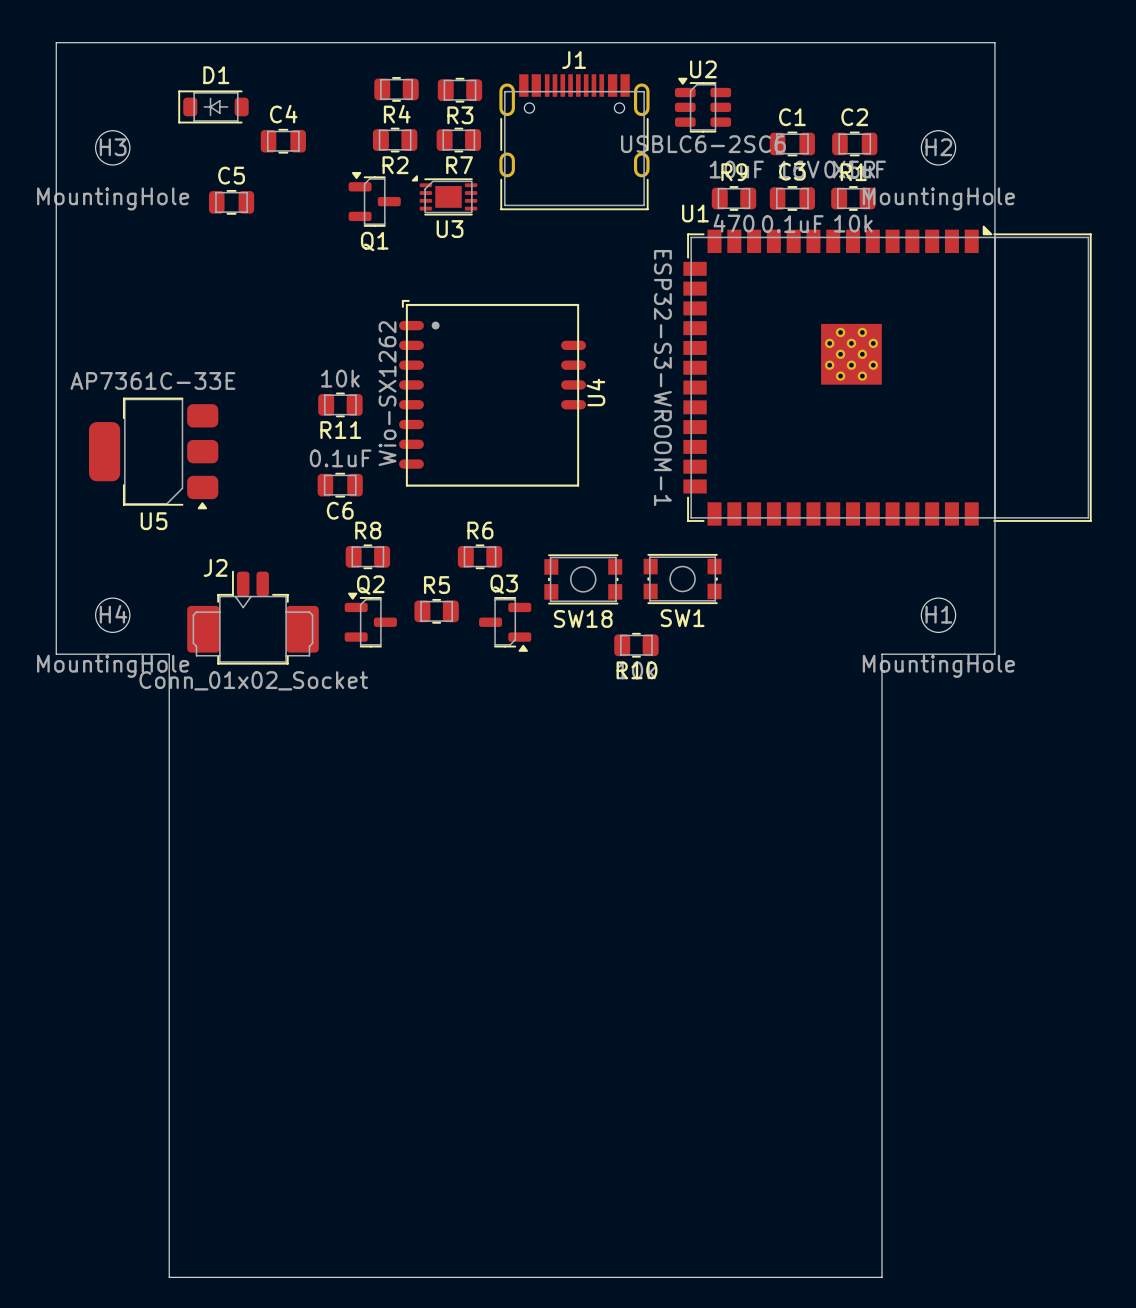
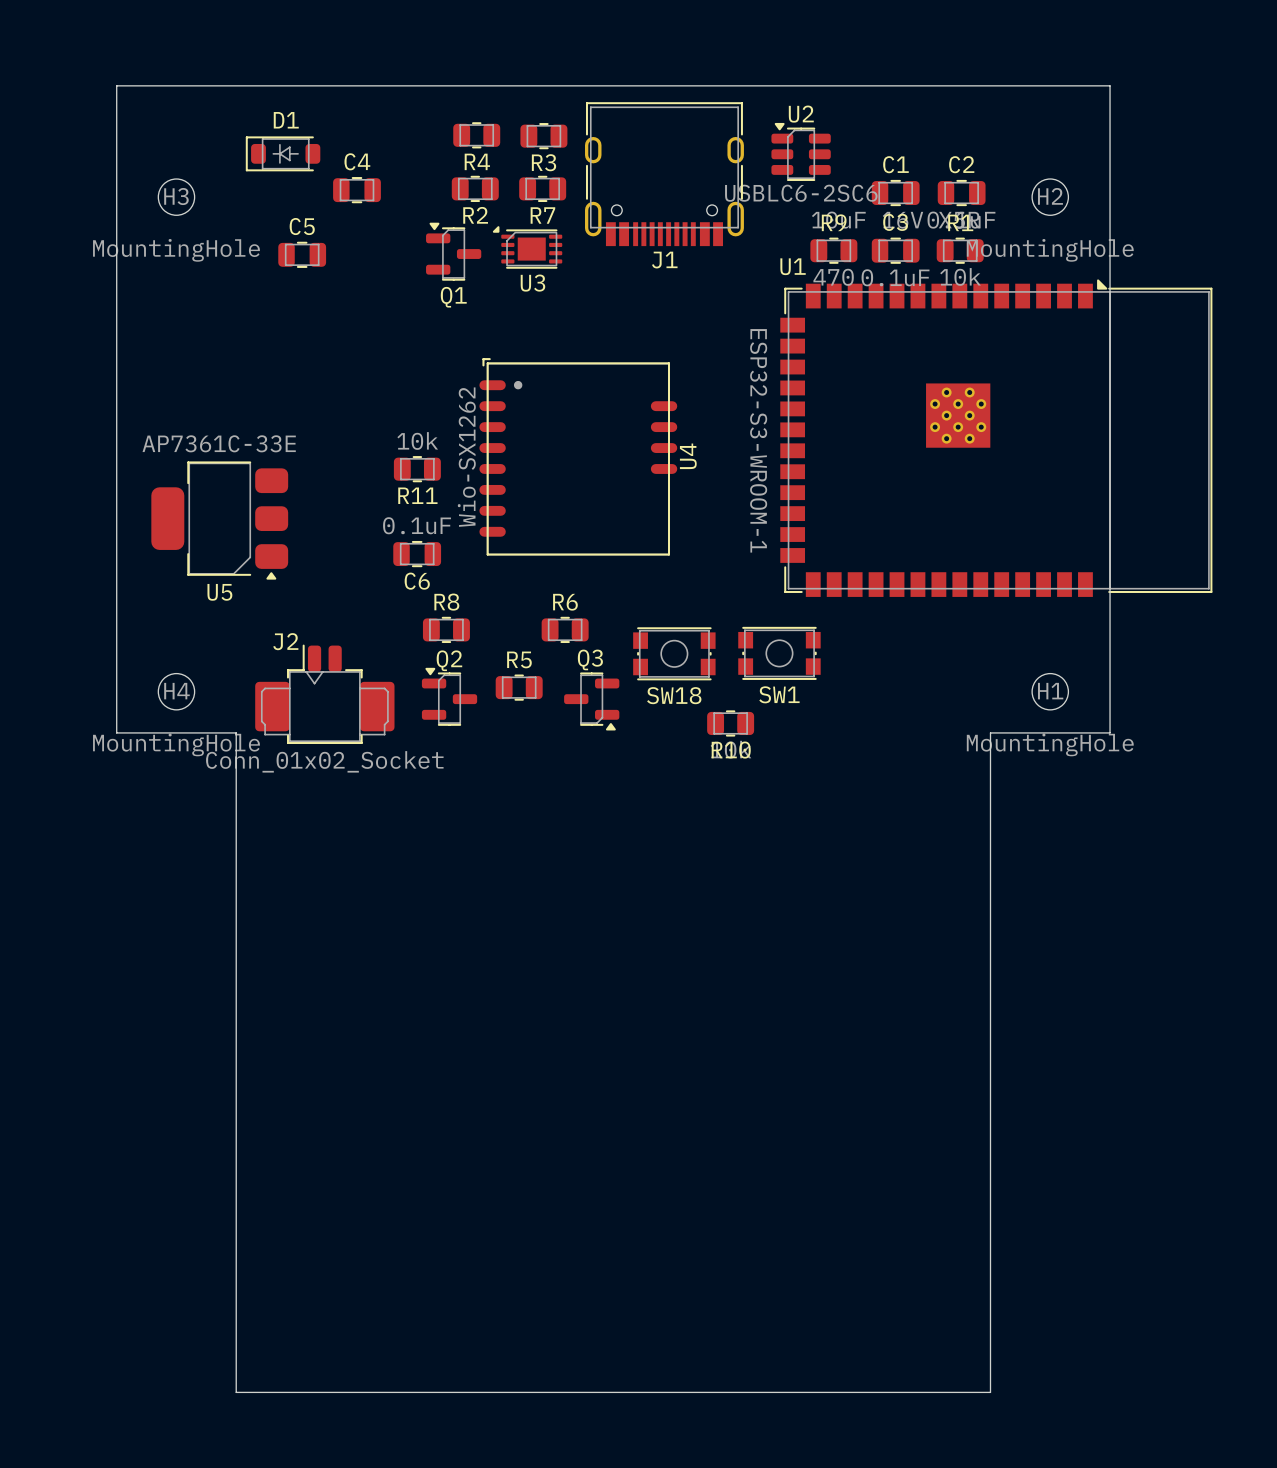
J1 rotation: 0° (574, 142) -> 180° (664, 174)

